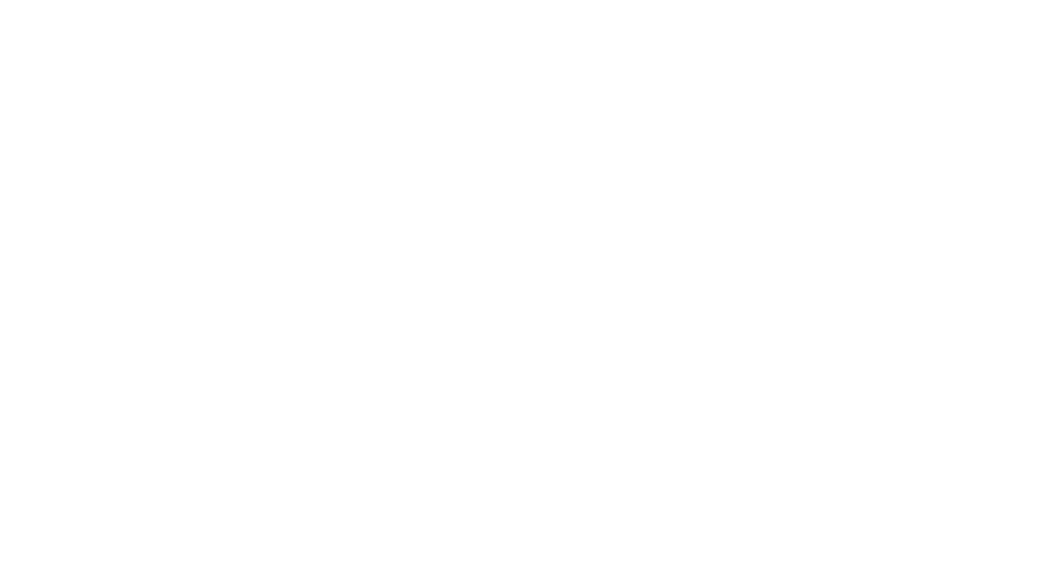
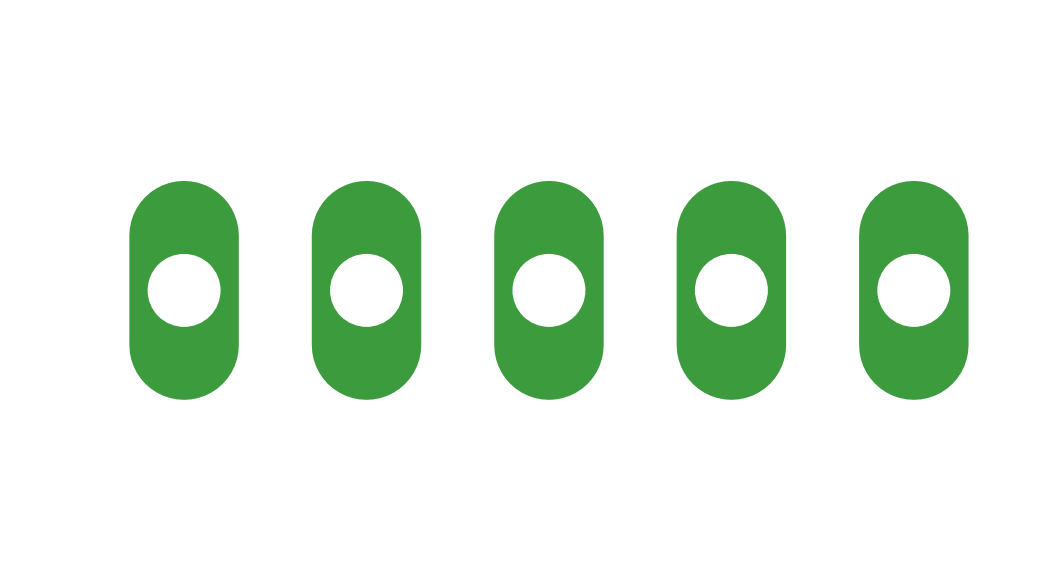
part: none -> (548, 290)

